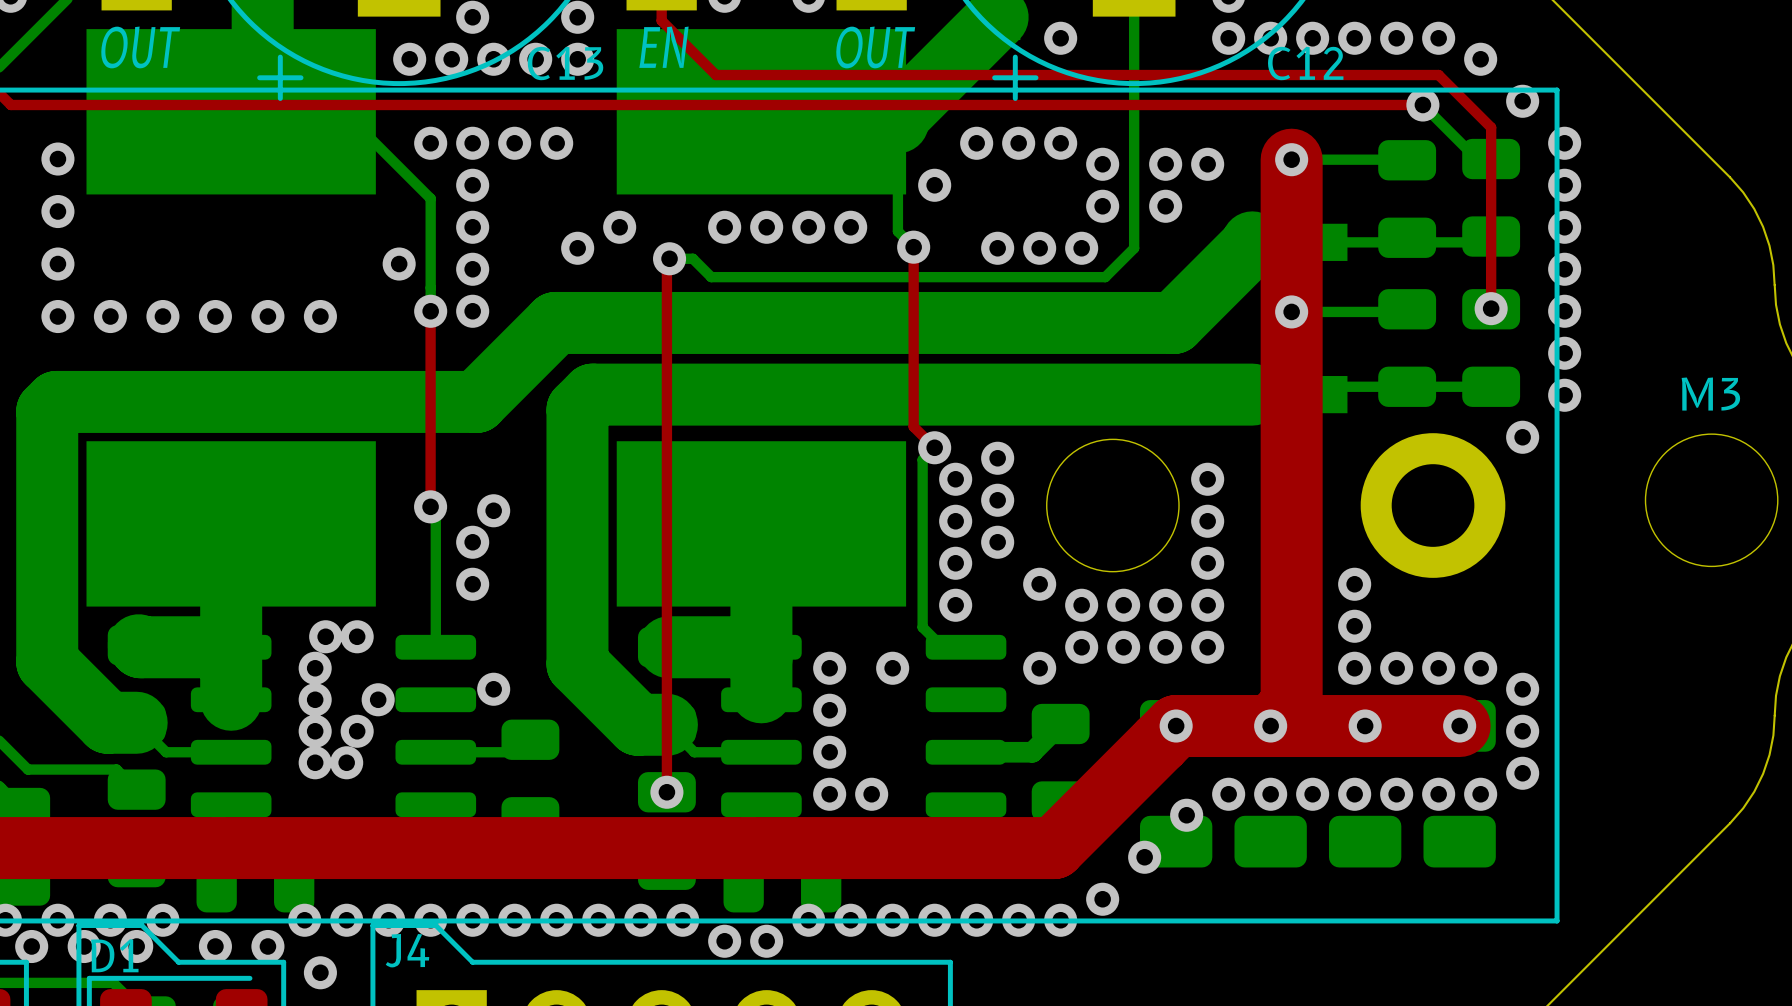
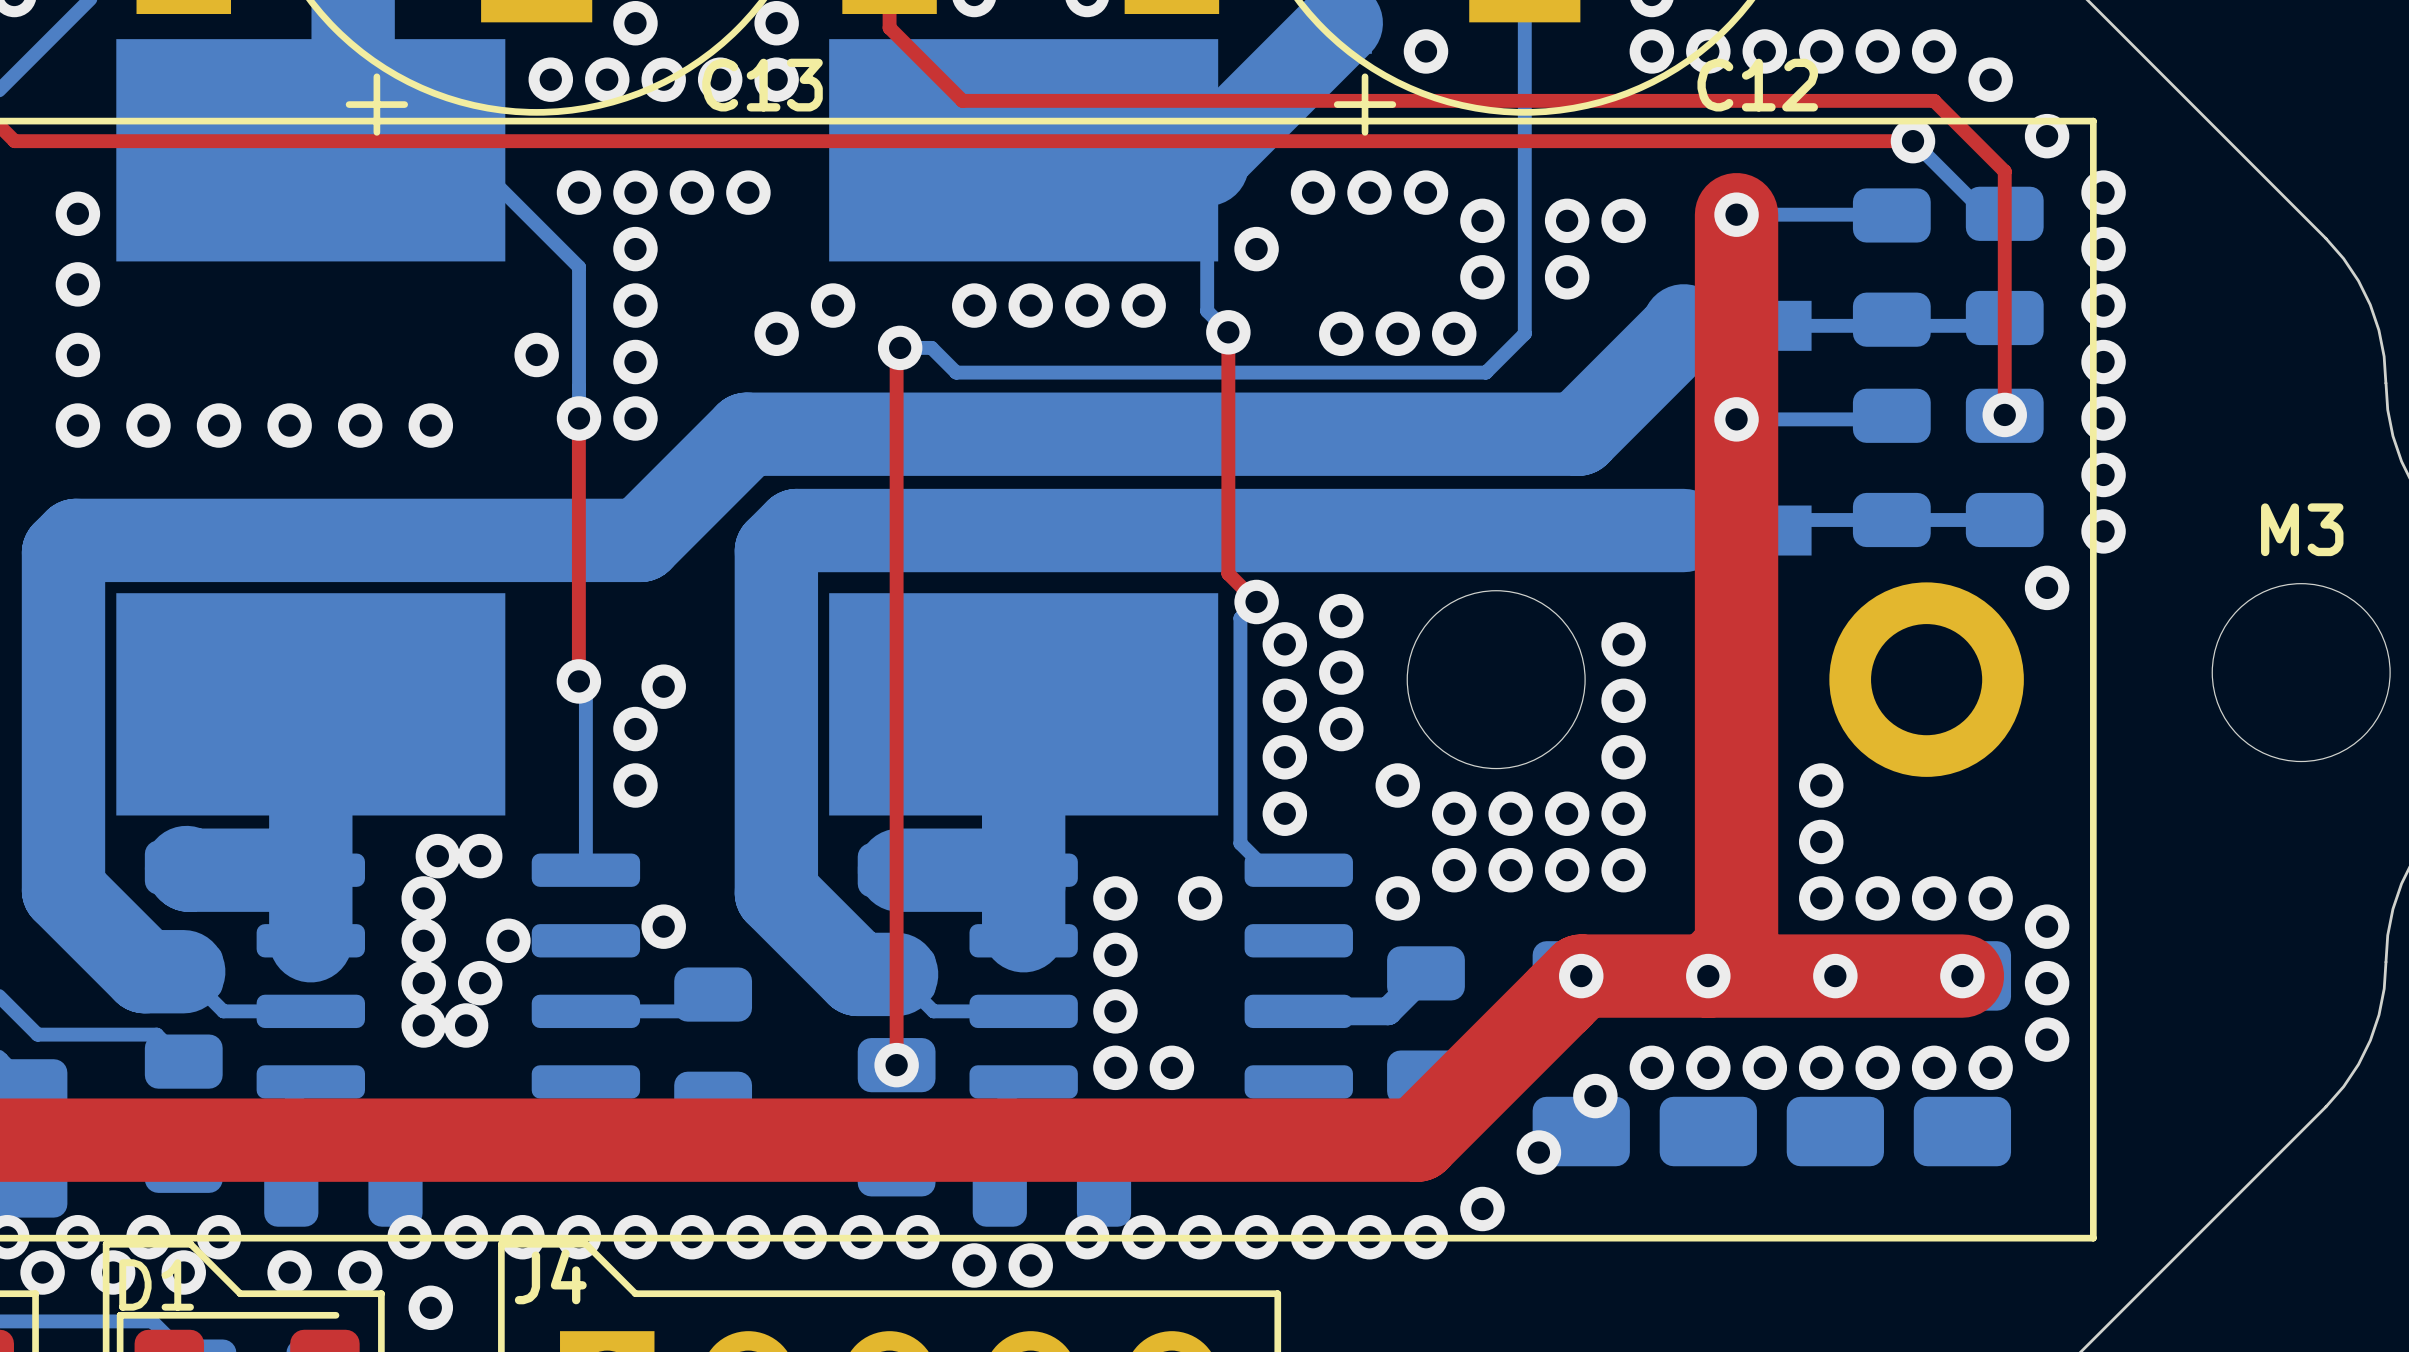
text: OUT (140, 47) -> none
text: EN (663, 47) -> none
text: OUT (875, 47) -> none

